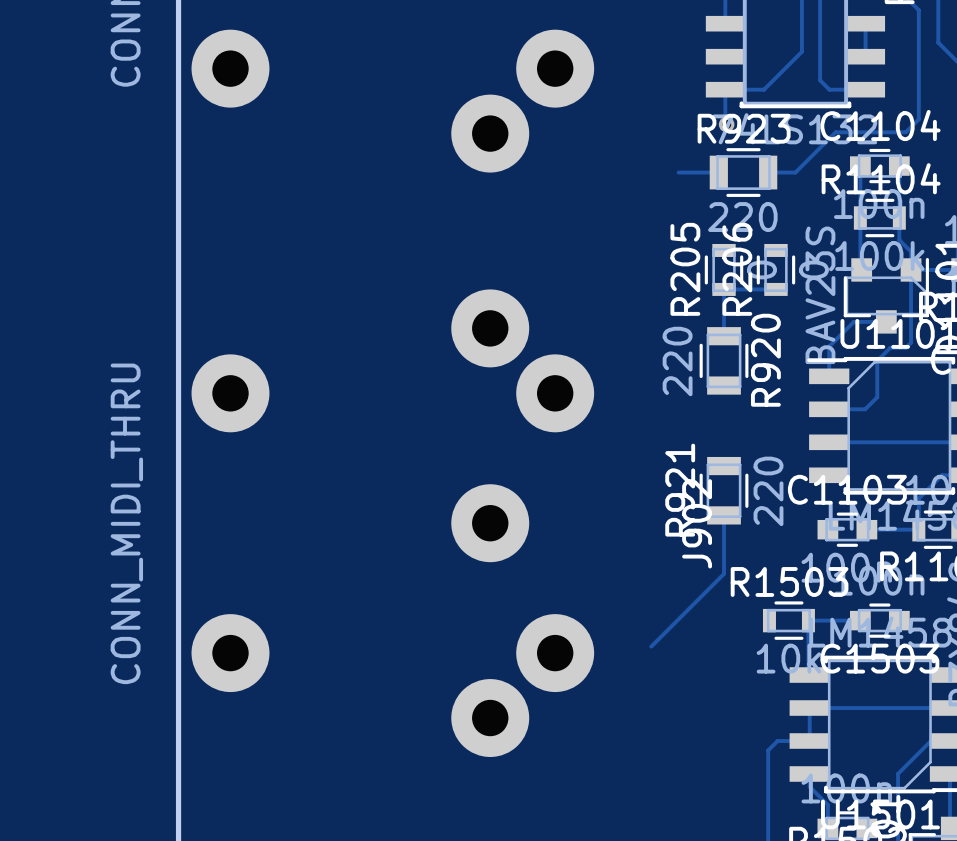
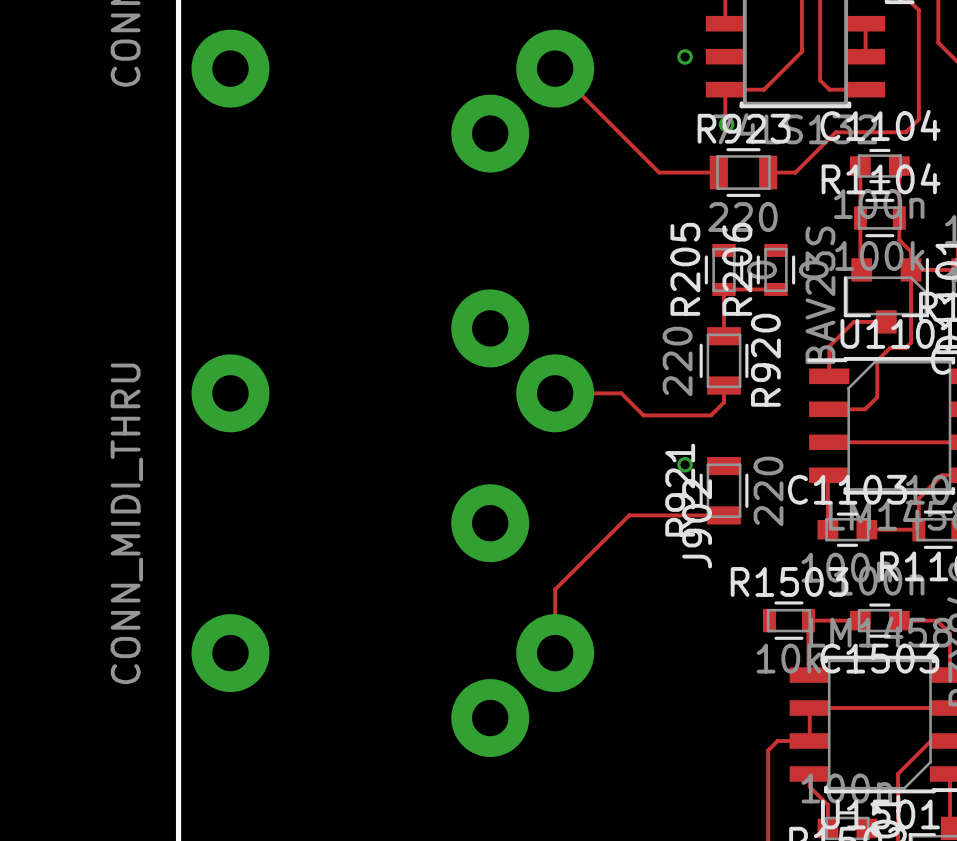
via: none -> (685, 56)
track: none -> (555, 68) (659, 172) (678, 172)
track: none -> (724, 385) (724, 402) (711, 415) (643, 415) (621, 393) (555, 393)
via: none -> (685, 464)
track: none -> (829, 475) (827, 529)
track: (724, 515) (724, 573) (651, 646) -> (724, 515) (629, 515) (555, 589) (555, 653)
track: none -> (899, 620) (937, 620) (950, 633) (950, 675)

